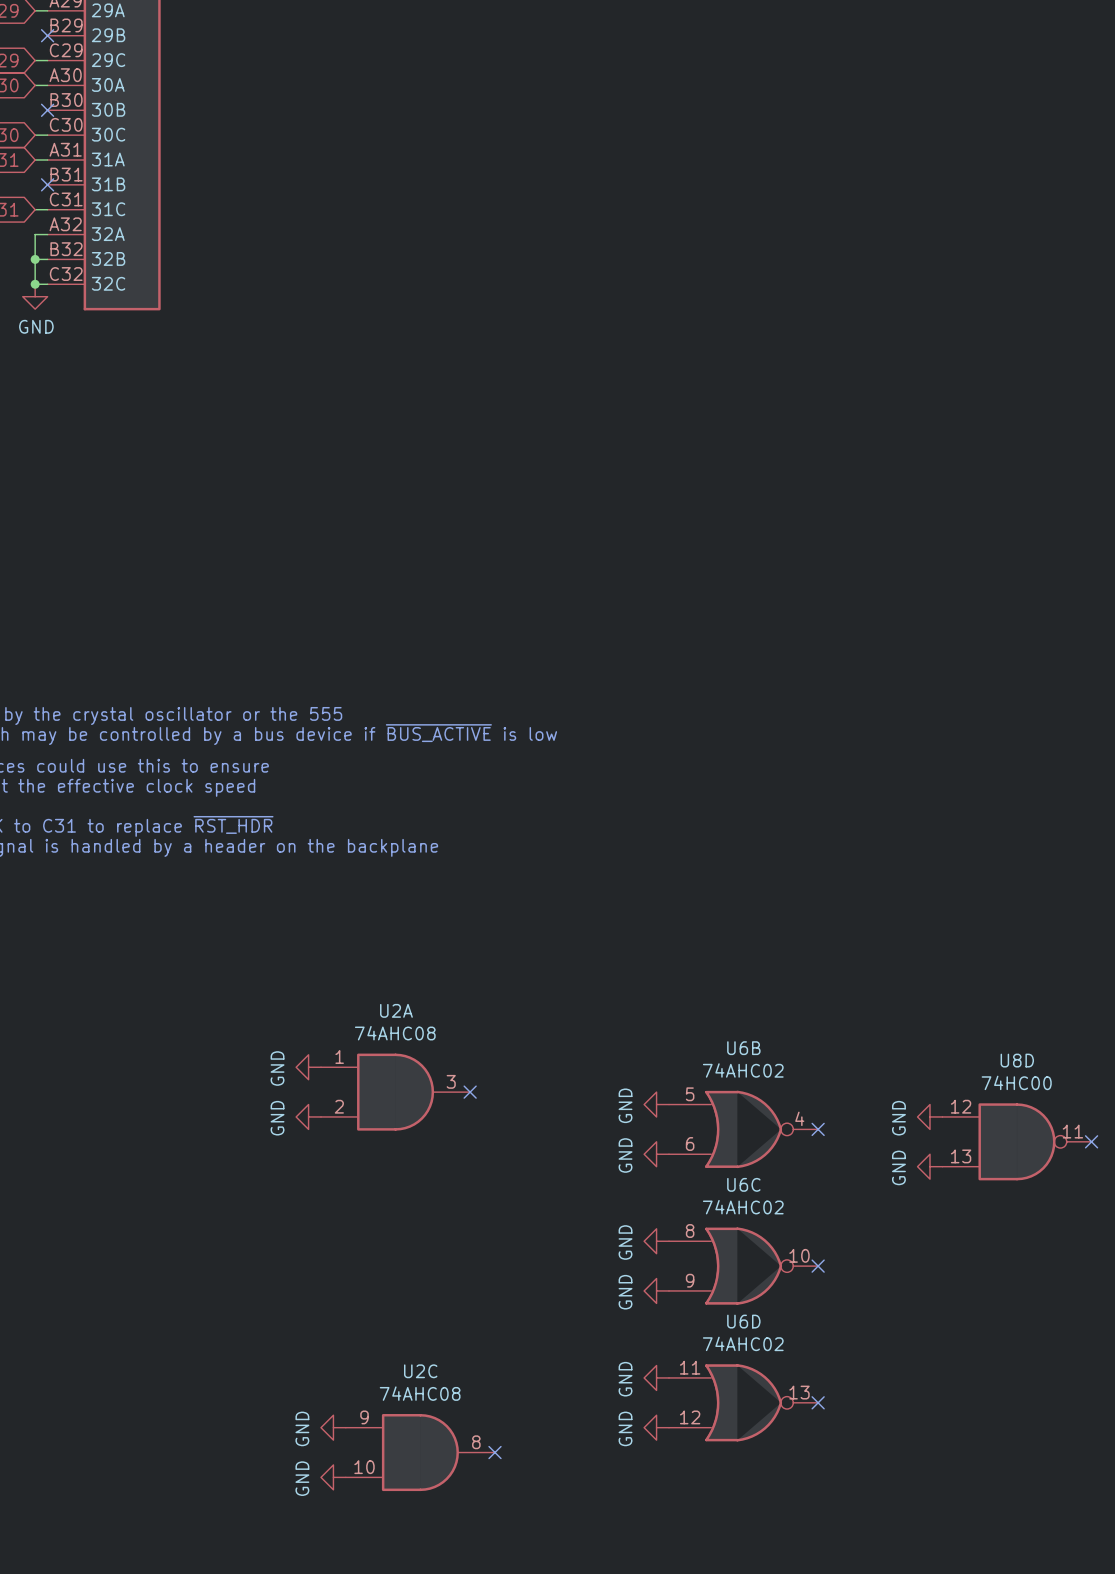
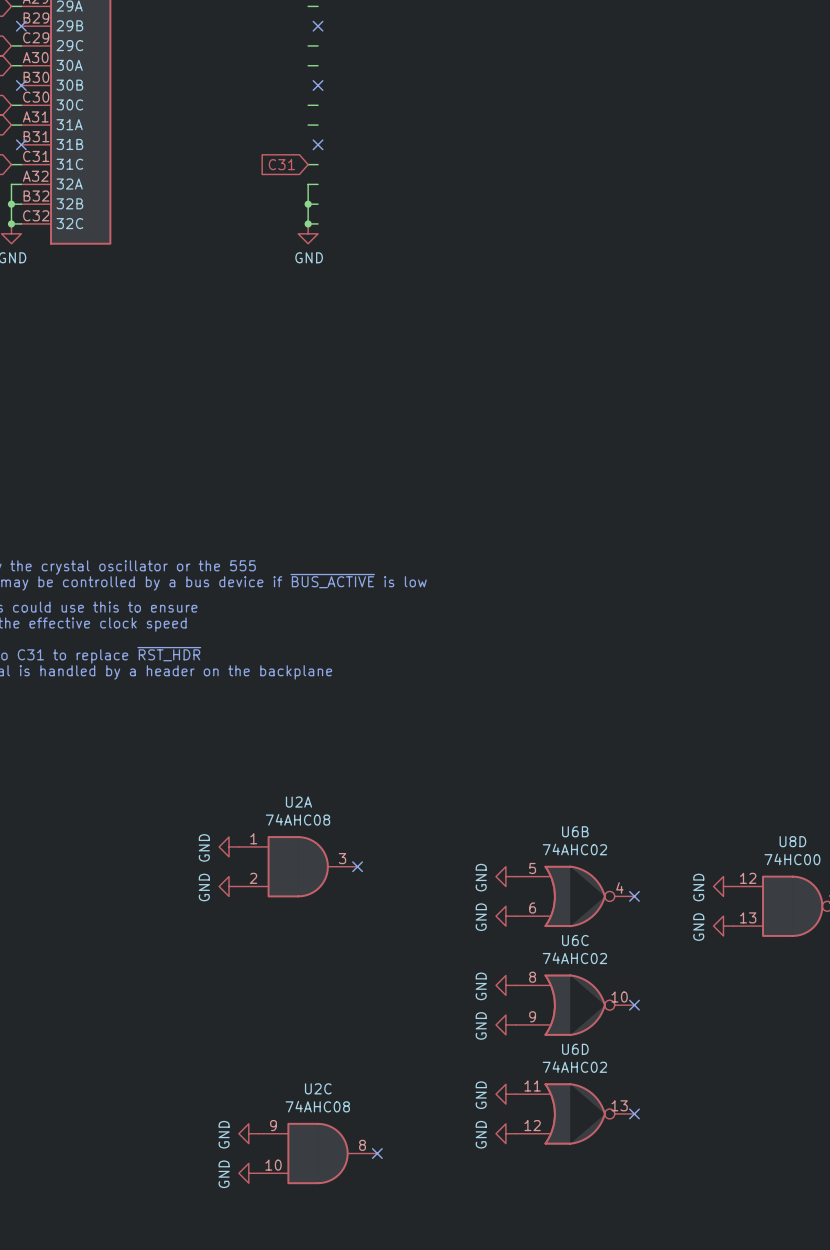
wire: none -> (308, 6) (318, 6)
no-connect mark: none -> (318, 26)
wire: none -> (308, 45) (318, 45)
wire: none -> (308, 65) (318, 65)
no-connect mark: none -> (318, 85)
wire: none -> (308, 105) (318, 105)
wire: none -> (308, 125) (318, 125)
no-connect mark: none -> (318, 144)
global label: none -> C31 (281, 164)
wire: none -> (308, 164) (318, 164)
wire: none -> (318, 184) (308, 184) (308, 223) (318, 223)
wire: none -> (308, 204) (318, 204)
junction: none -> (308, 204)
junction: none -> (308, 223)
power symbol: none -> GND (308, 233)

